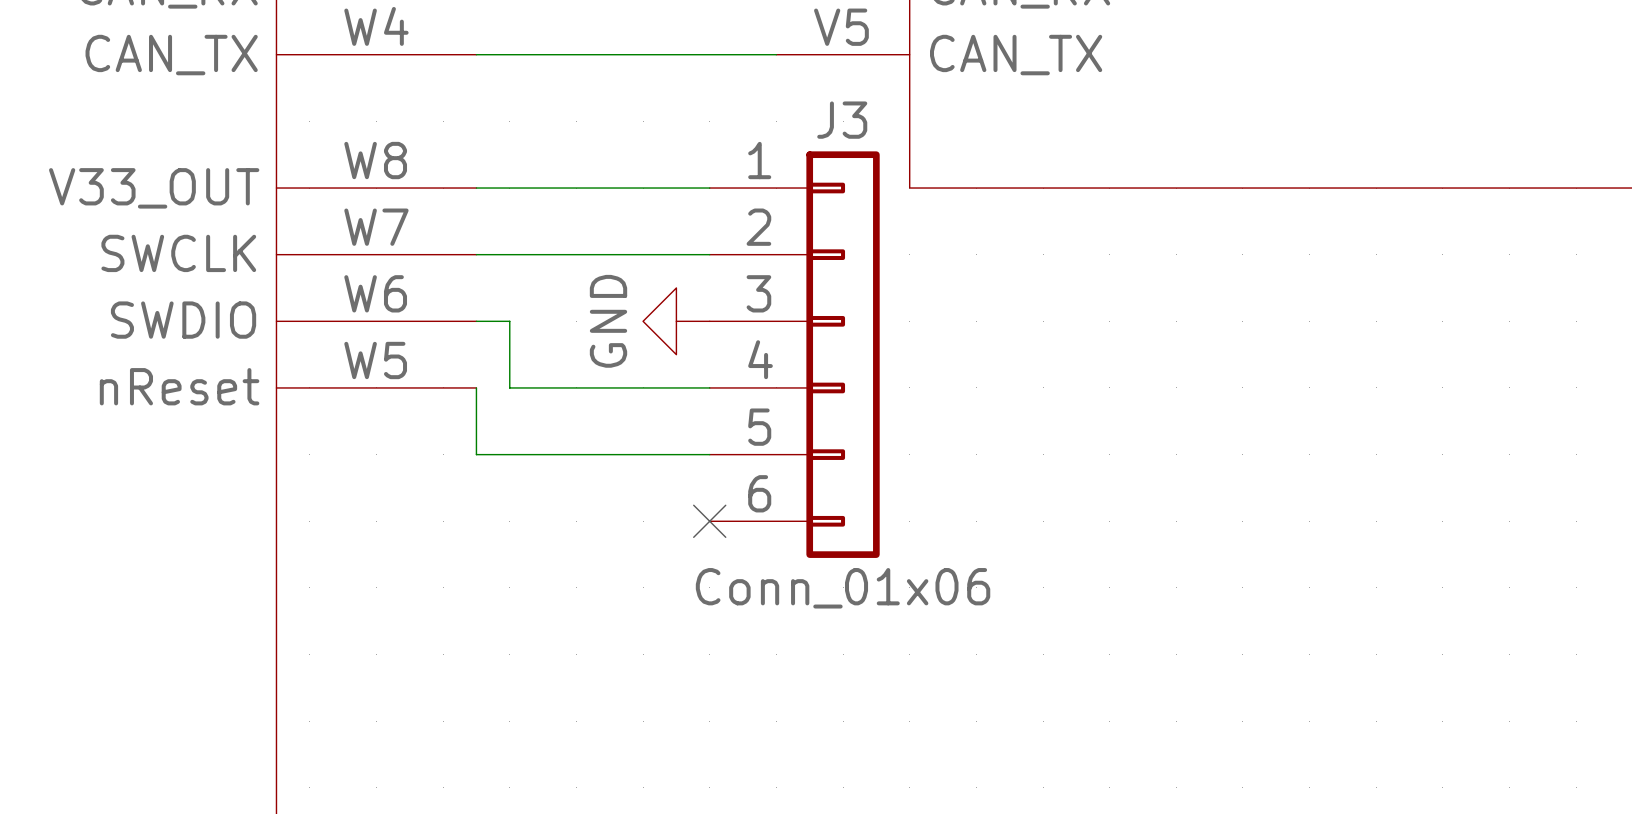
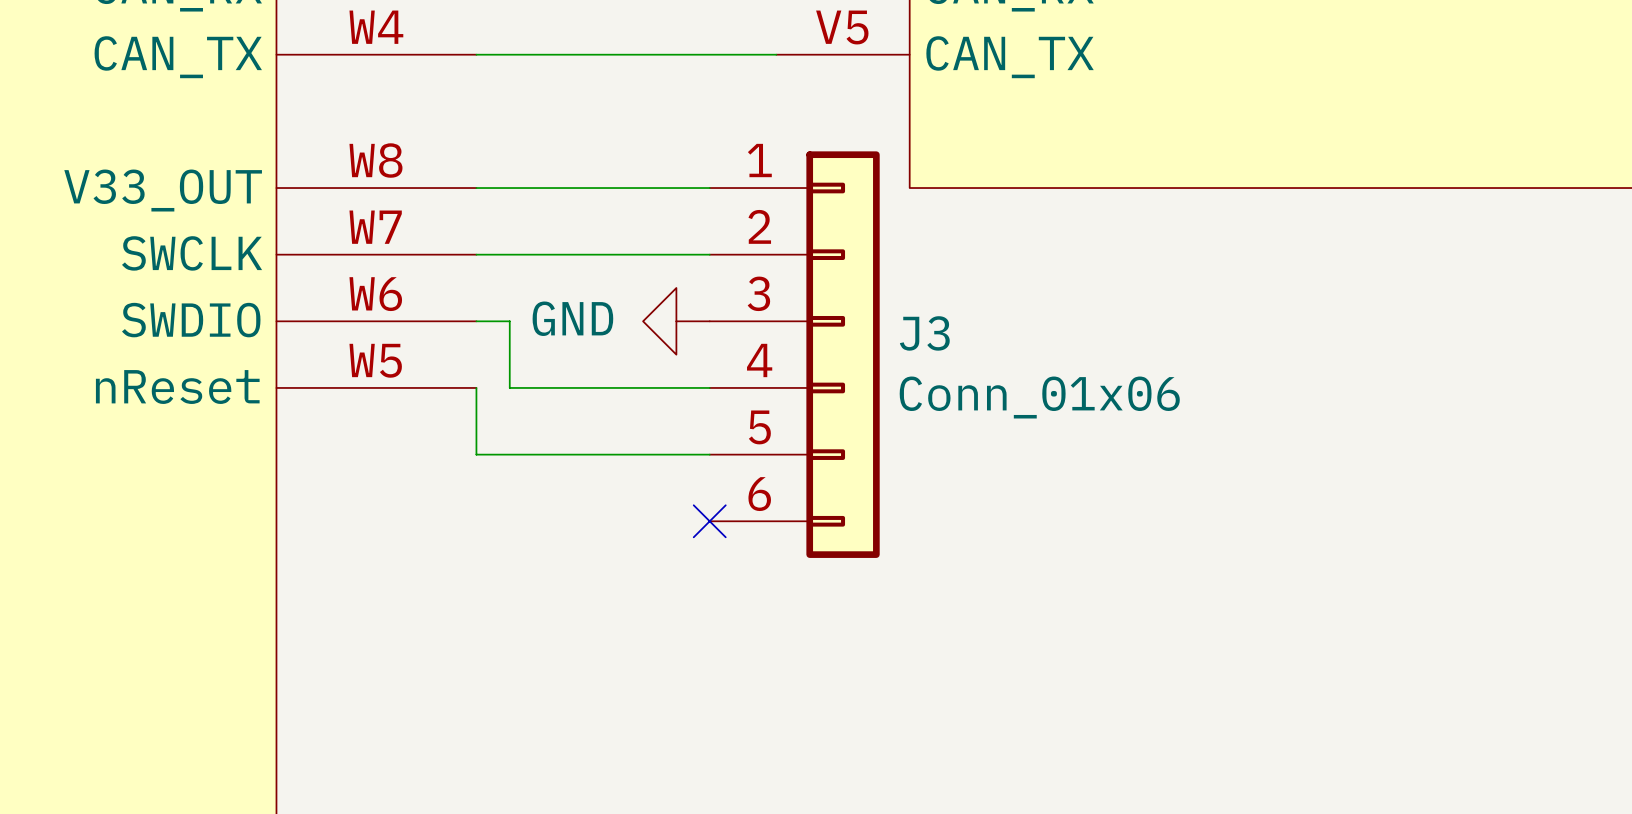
J3 name position: J3 (842, 120) -> J3 (924, 333)
power symbol text rotation: 0° (608, 321) -> 90° clockwise (572, 318)
J3 value position: Conn_01x06 (843, 588) -> Conn_01x06 (1039, 397)

